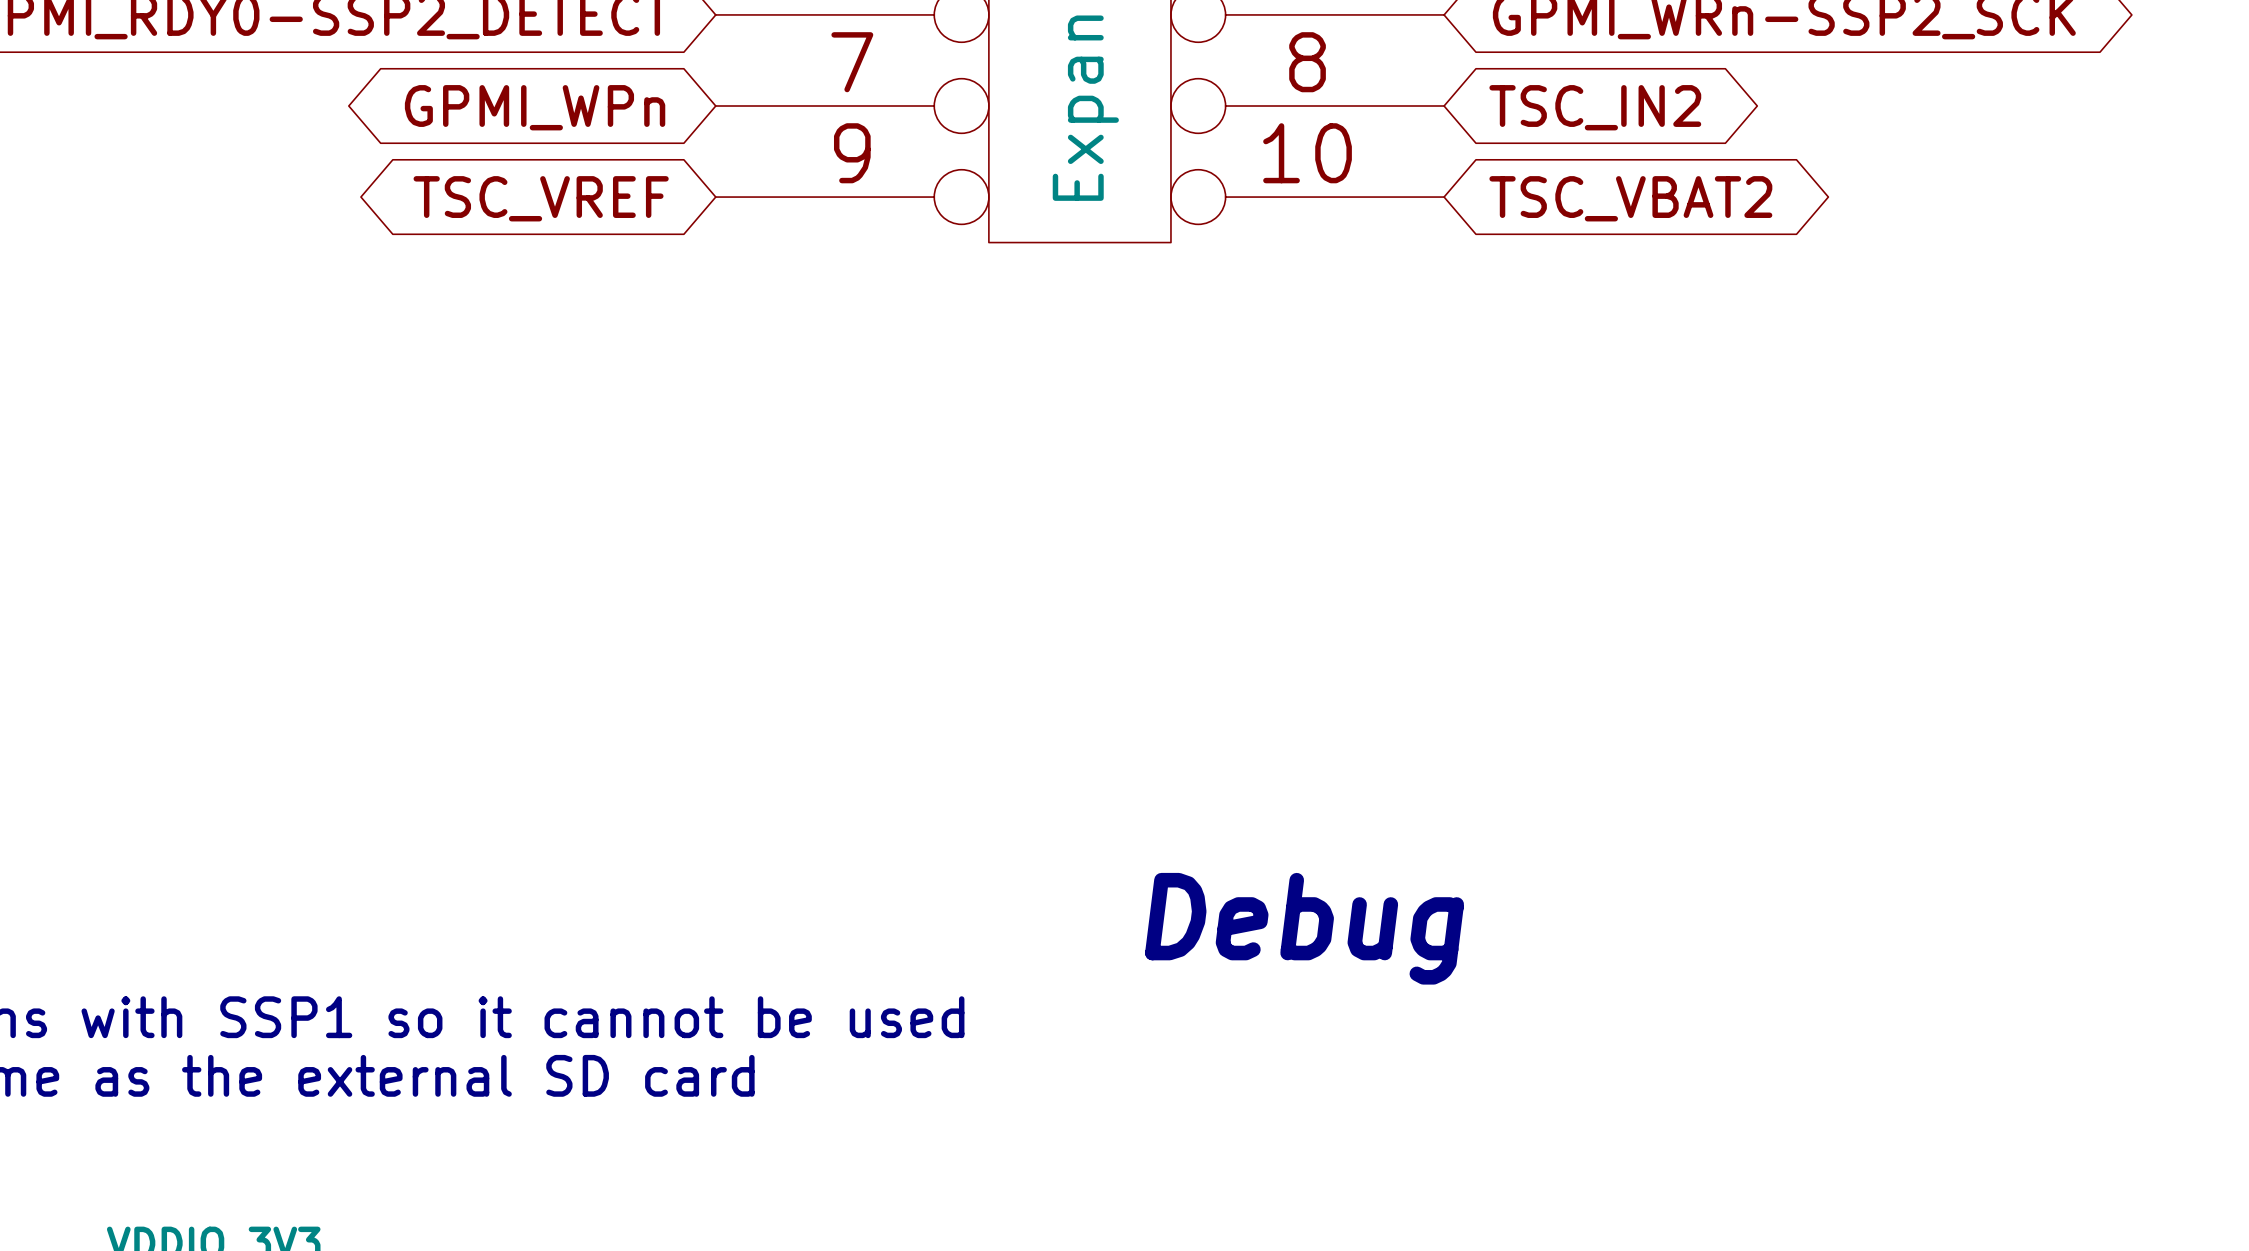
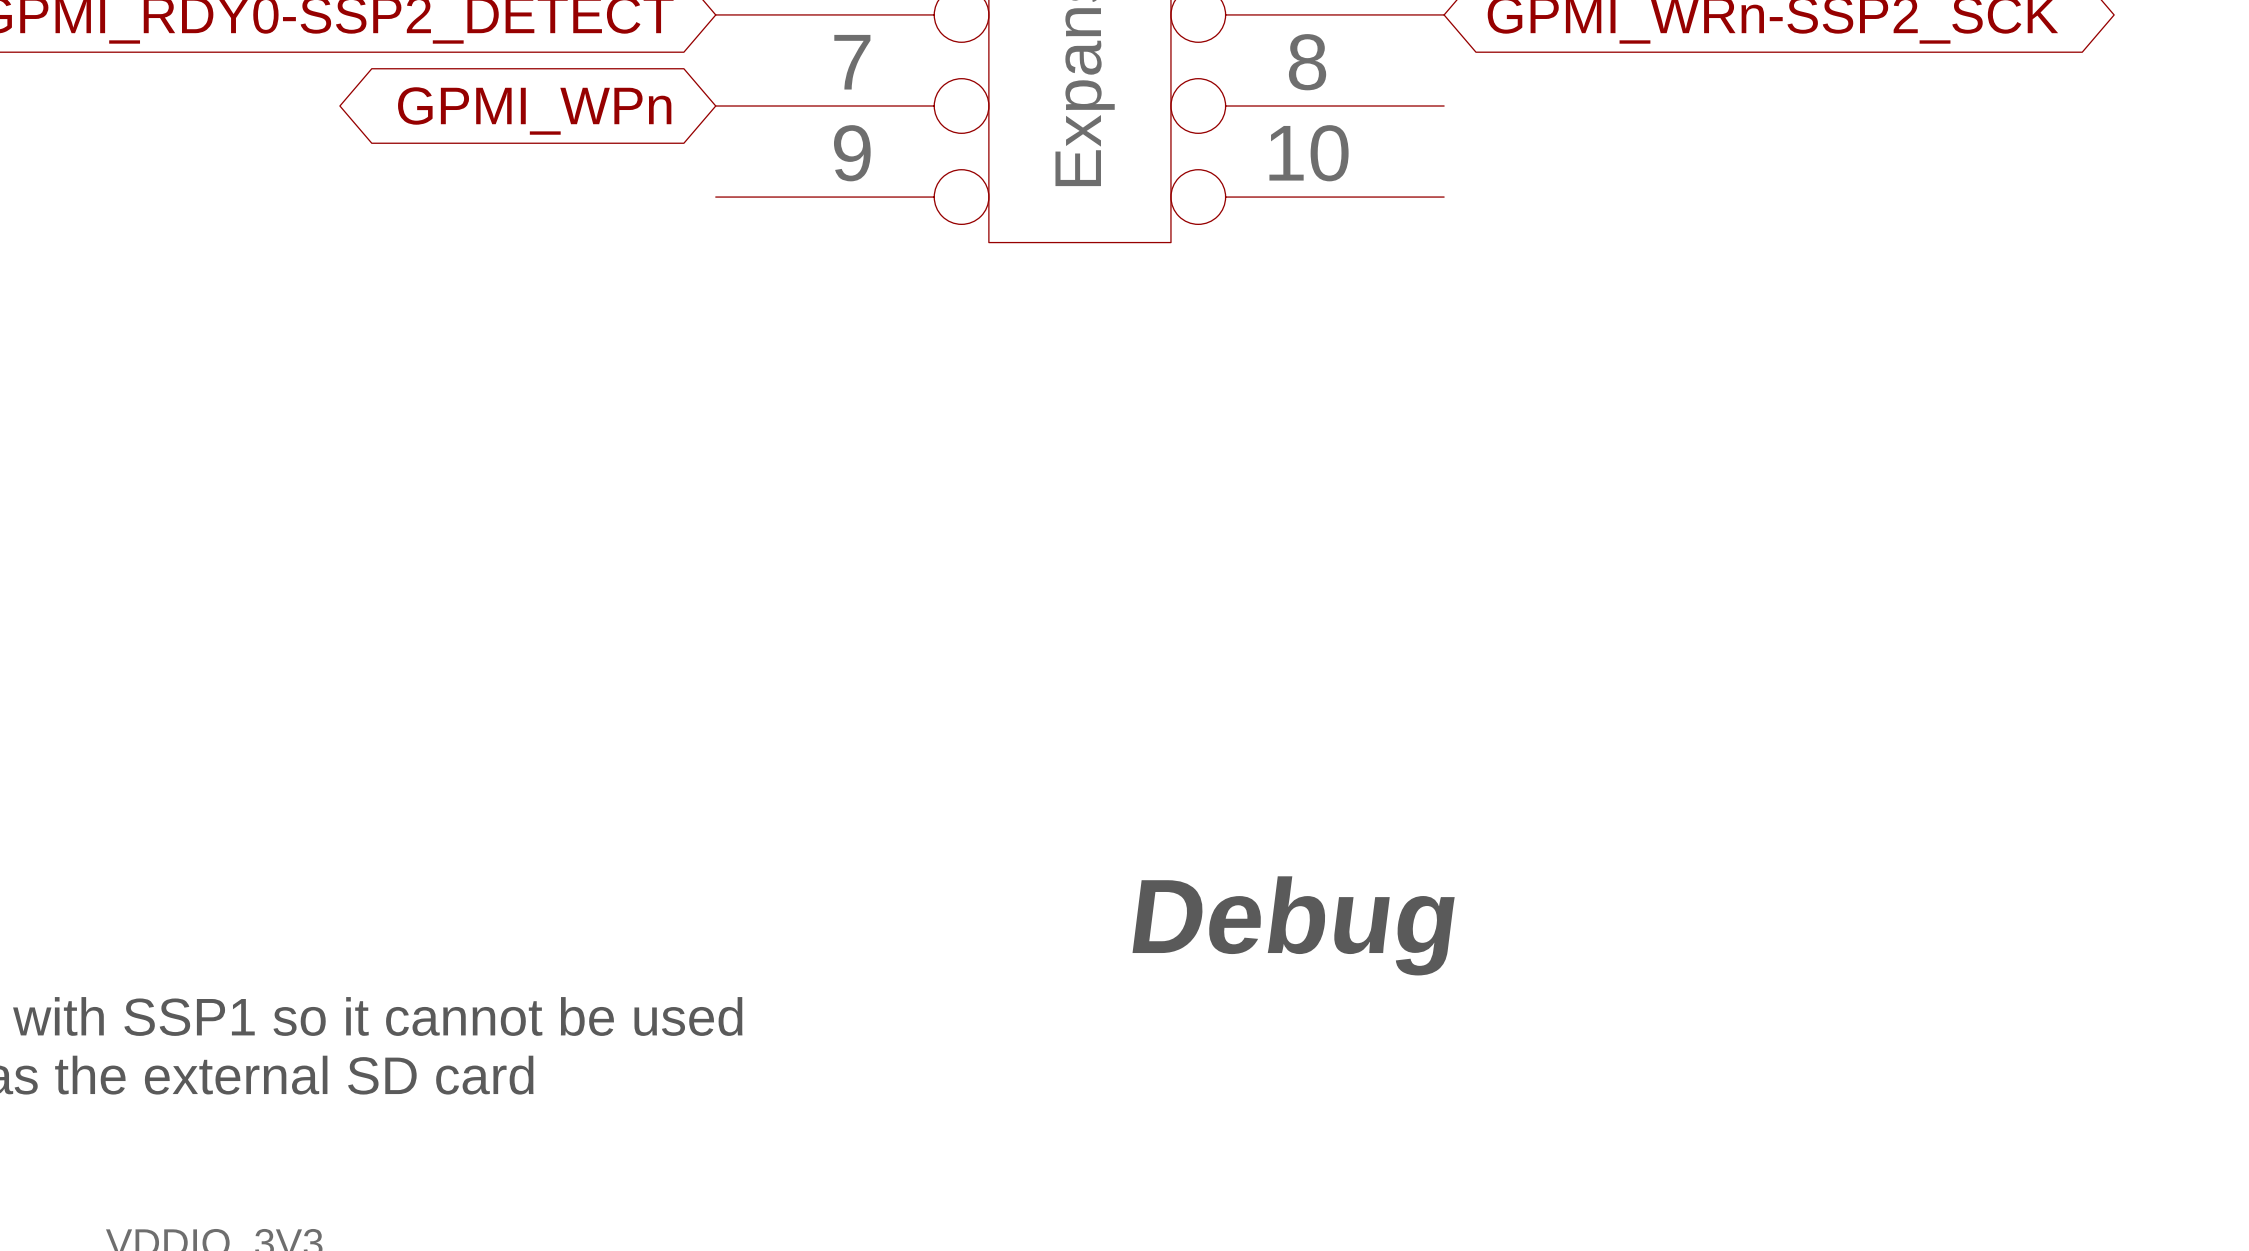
global label: TSC_IN2 (1595, 107) -> none
global label: TSC_VREF (541, 198) -> none
global label: TSC_VBAT2 (1630, 198) -> none

